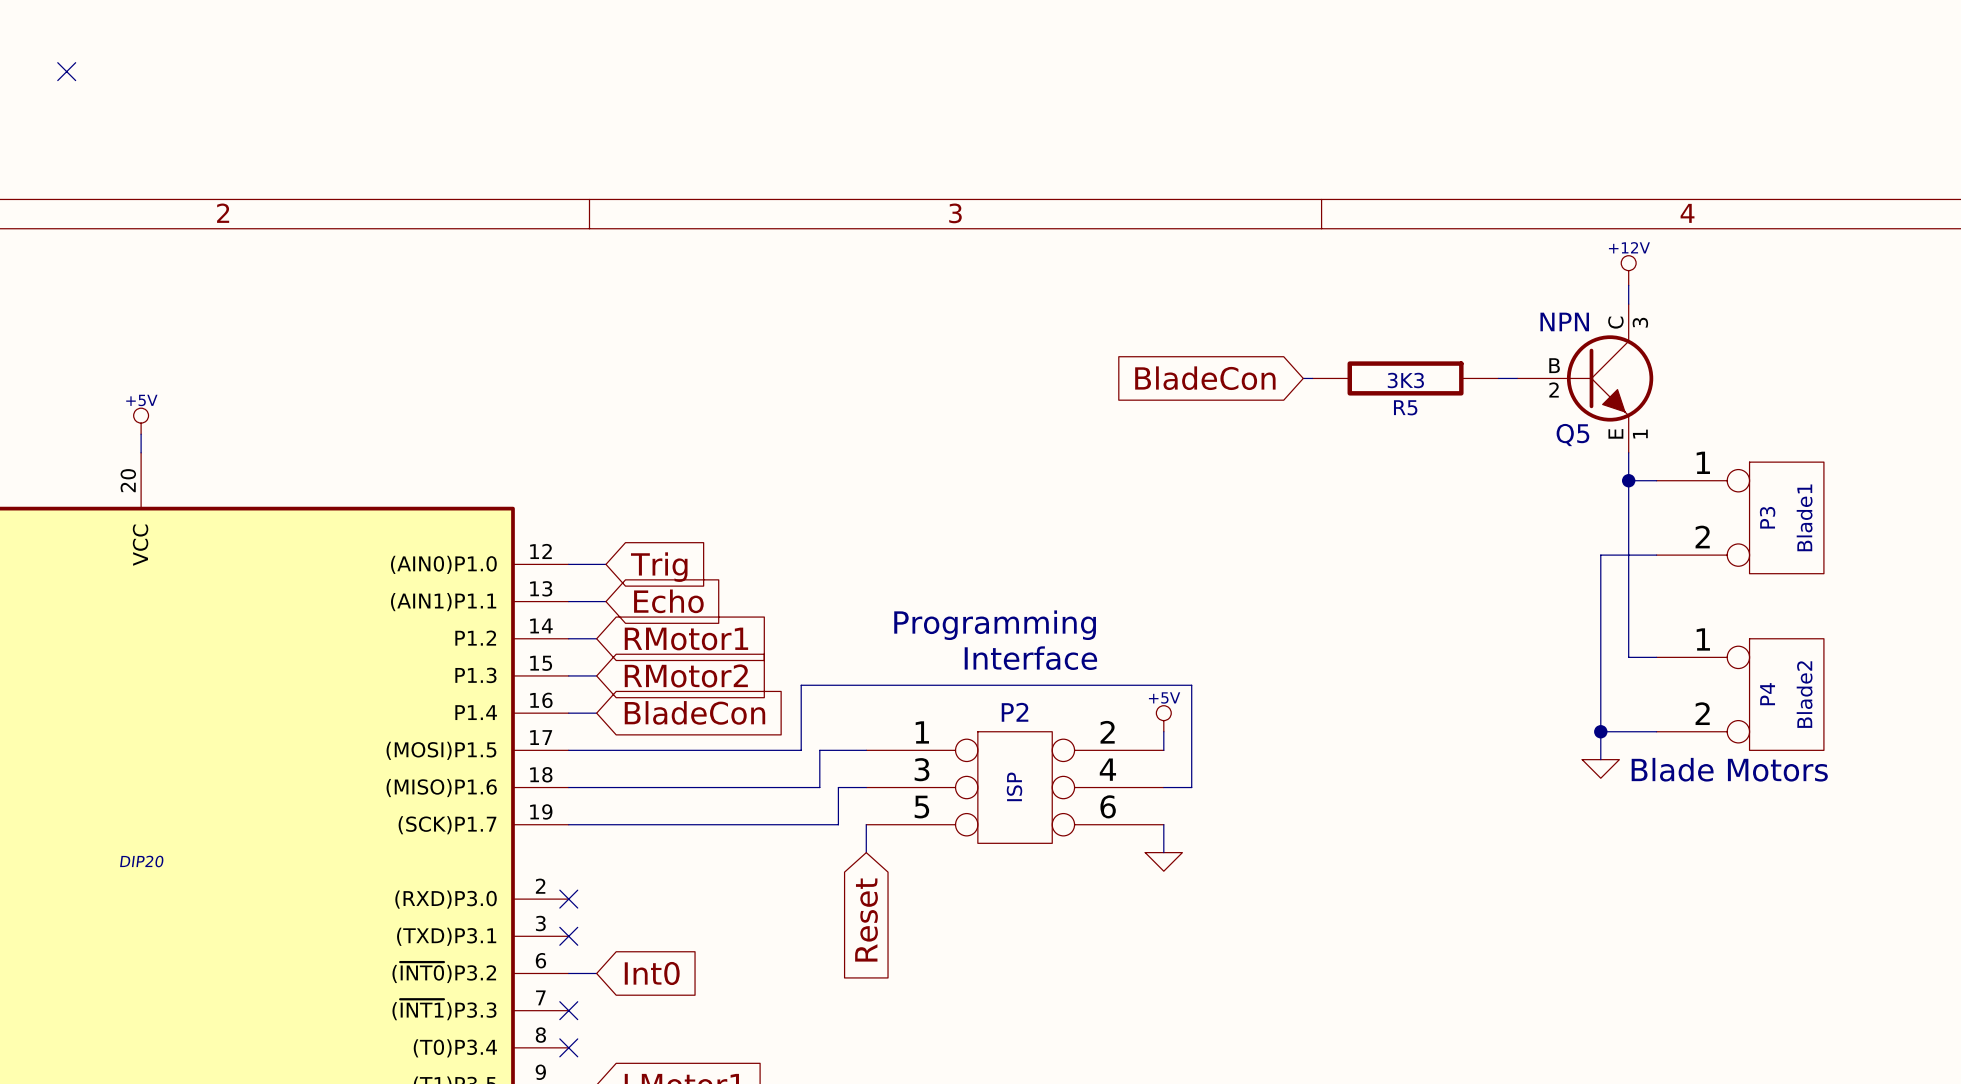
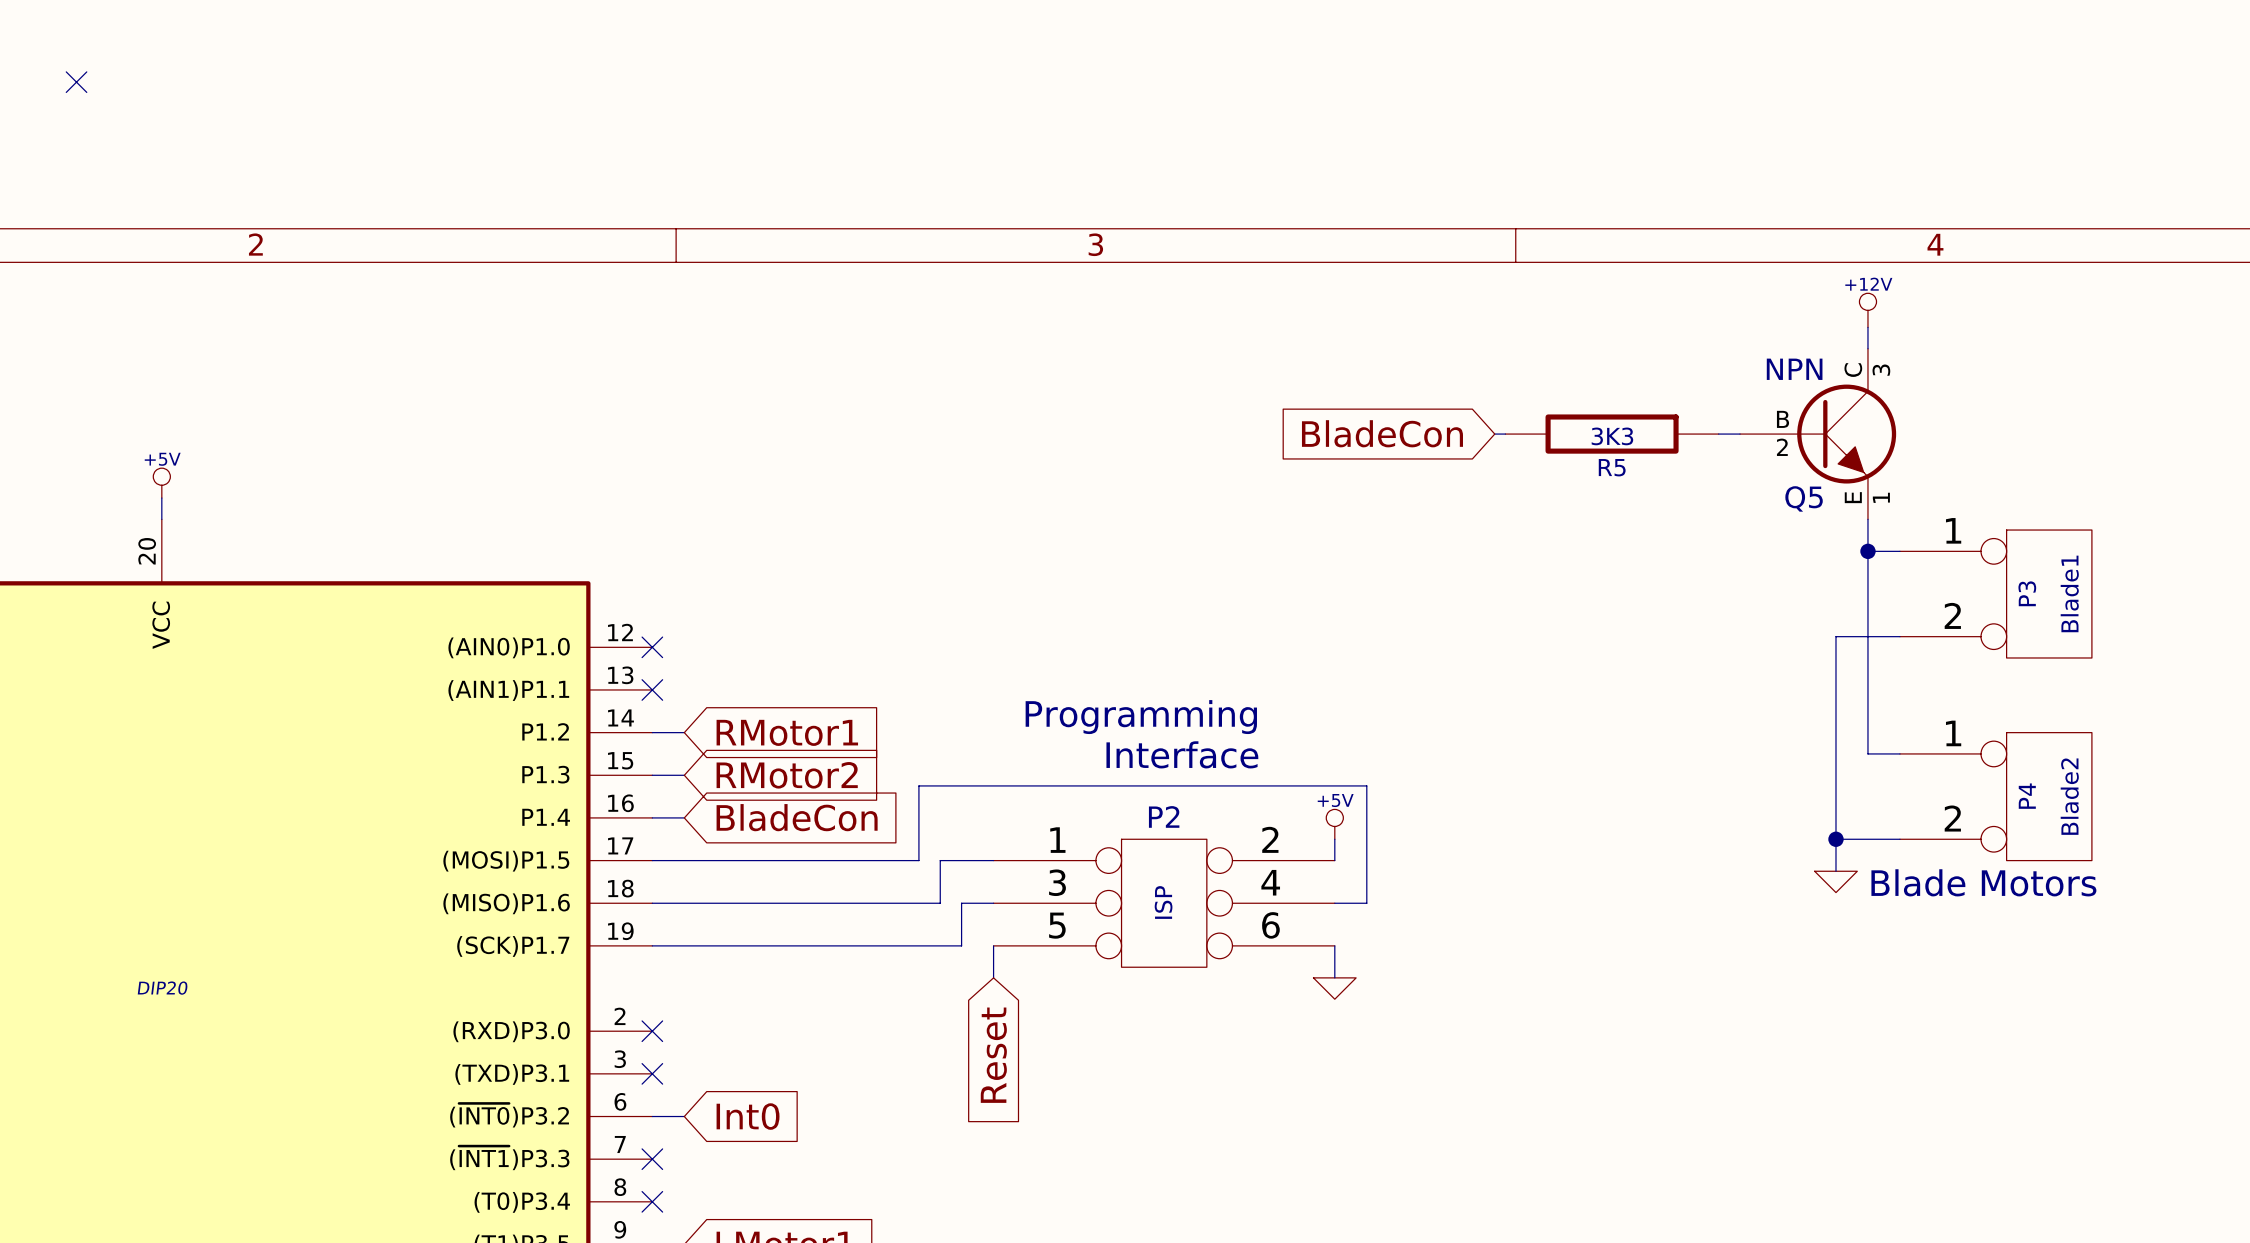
wire: (568, 564) (605, 564) -> none
no-connect mark: none -> (652, 647)
global label: Trig (659, 567) -> none
wire: (568, 601) (605, 601) -> none
no-connect mark: none -> (652, 689)
global label: Echo (668, 601) -> none

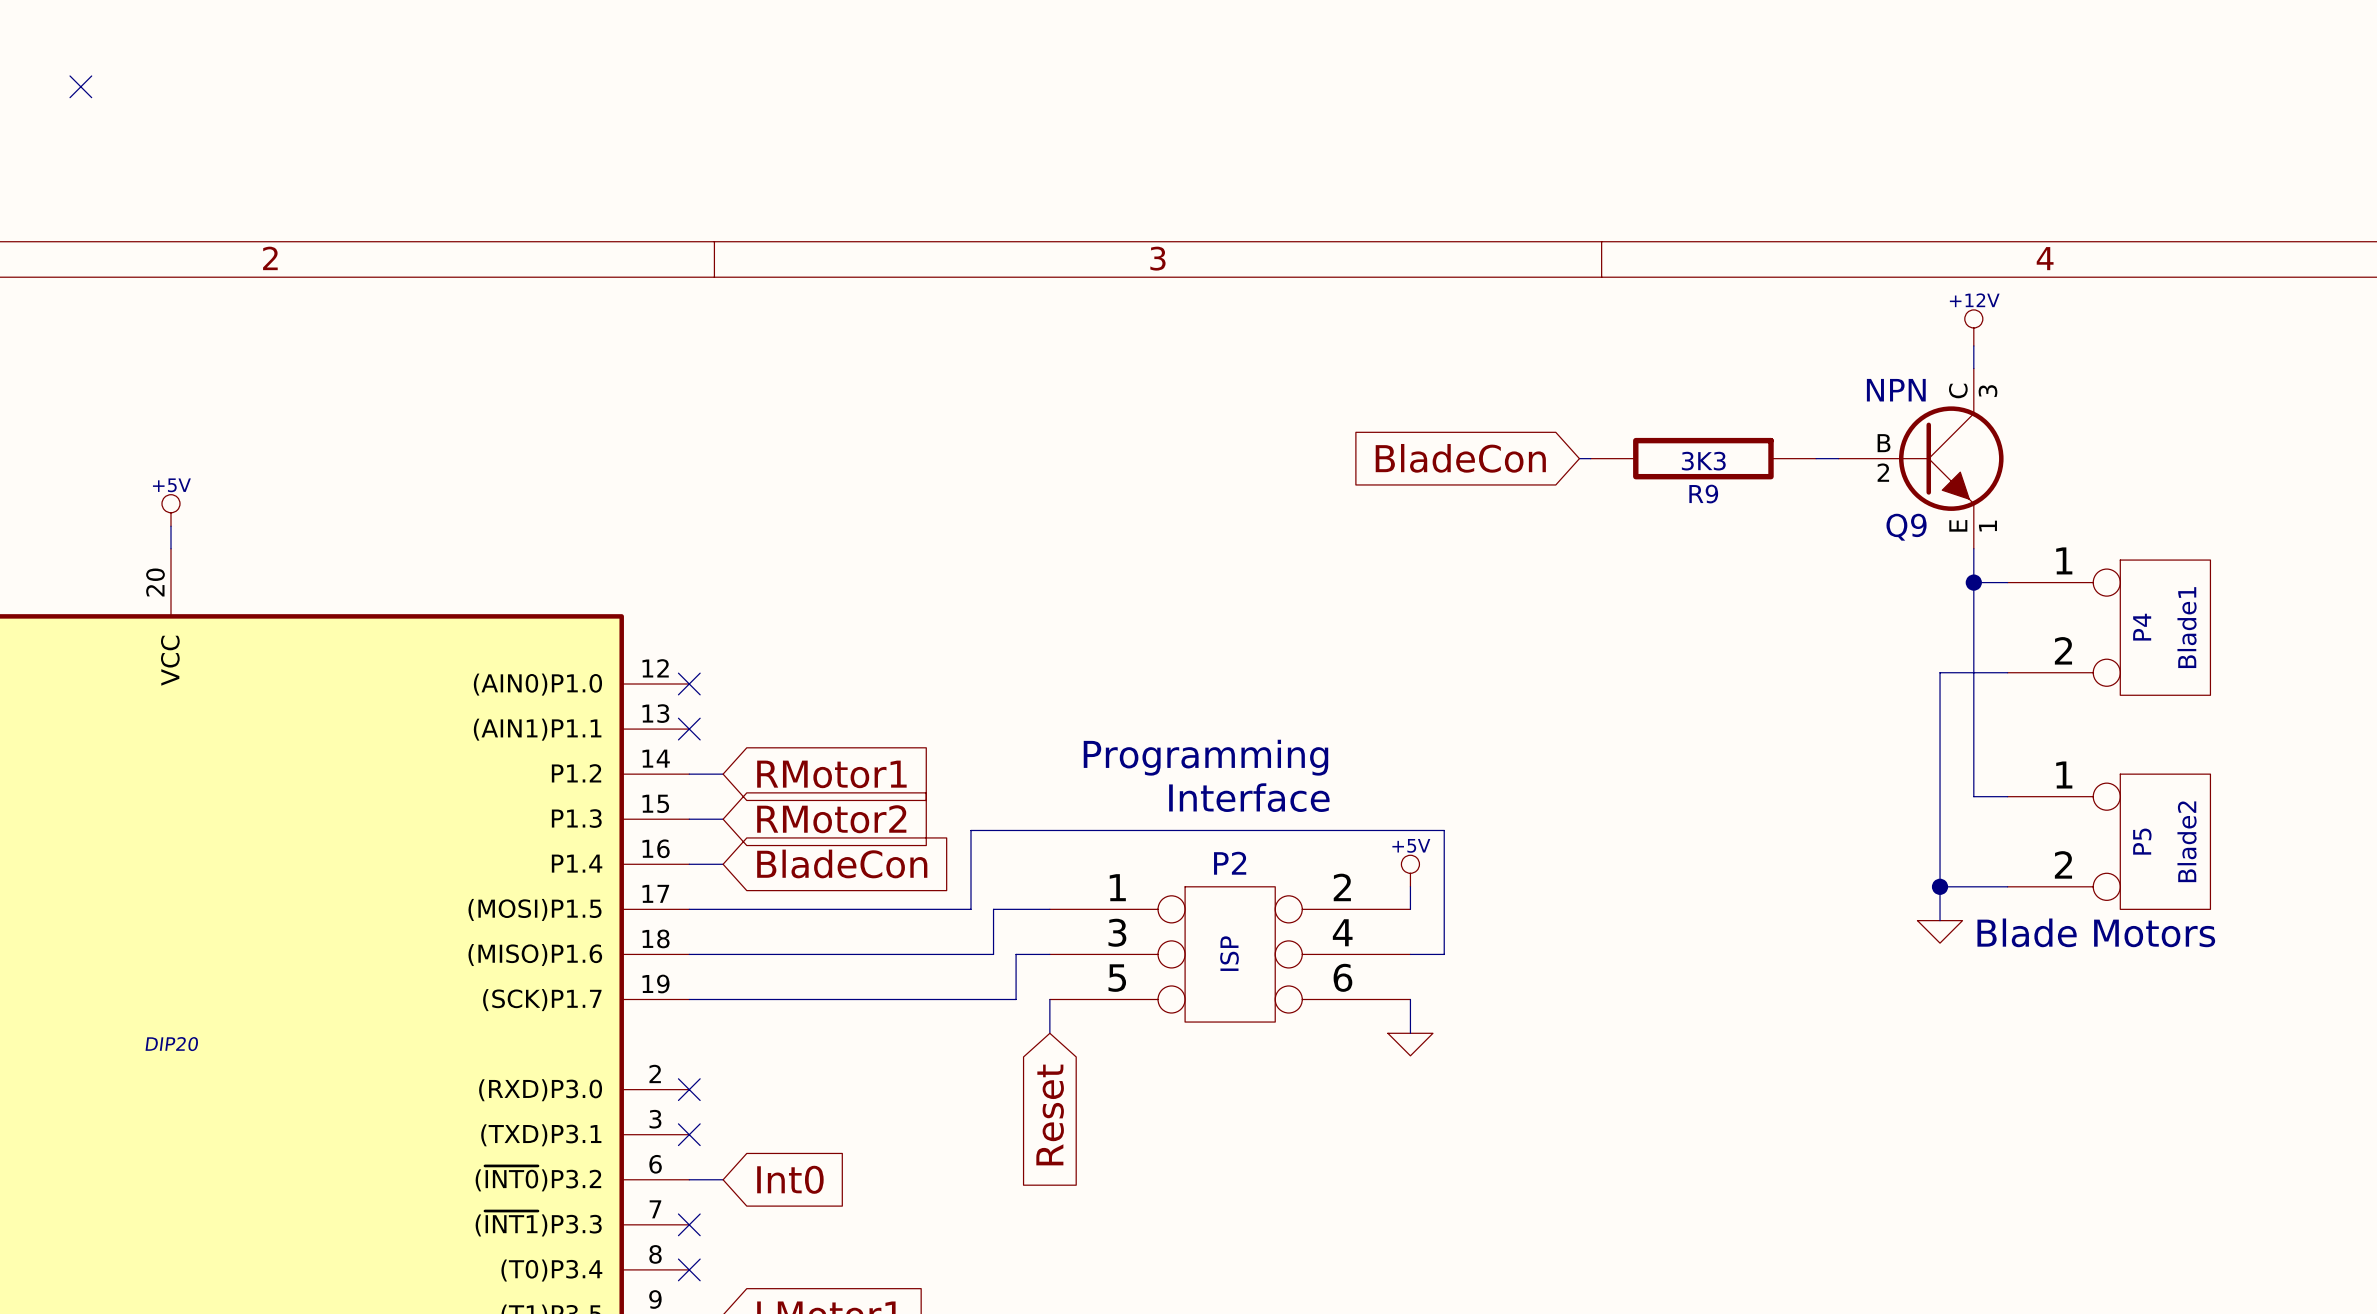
R5 name: R5 (1612, 467) -> R9 (1703, 494)
Q5 name: Q5 (1804, 498) -> Q9 (1906, 527)
P3 name: P3 (2027, 593) -> P4 (2142, 627)
P4 name: P4 (2027, 796) -> P5 (2142, 841)

